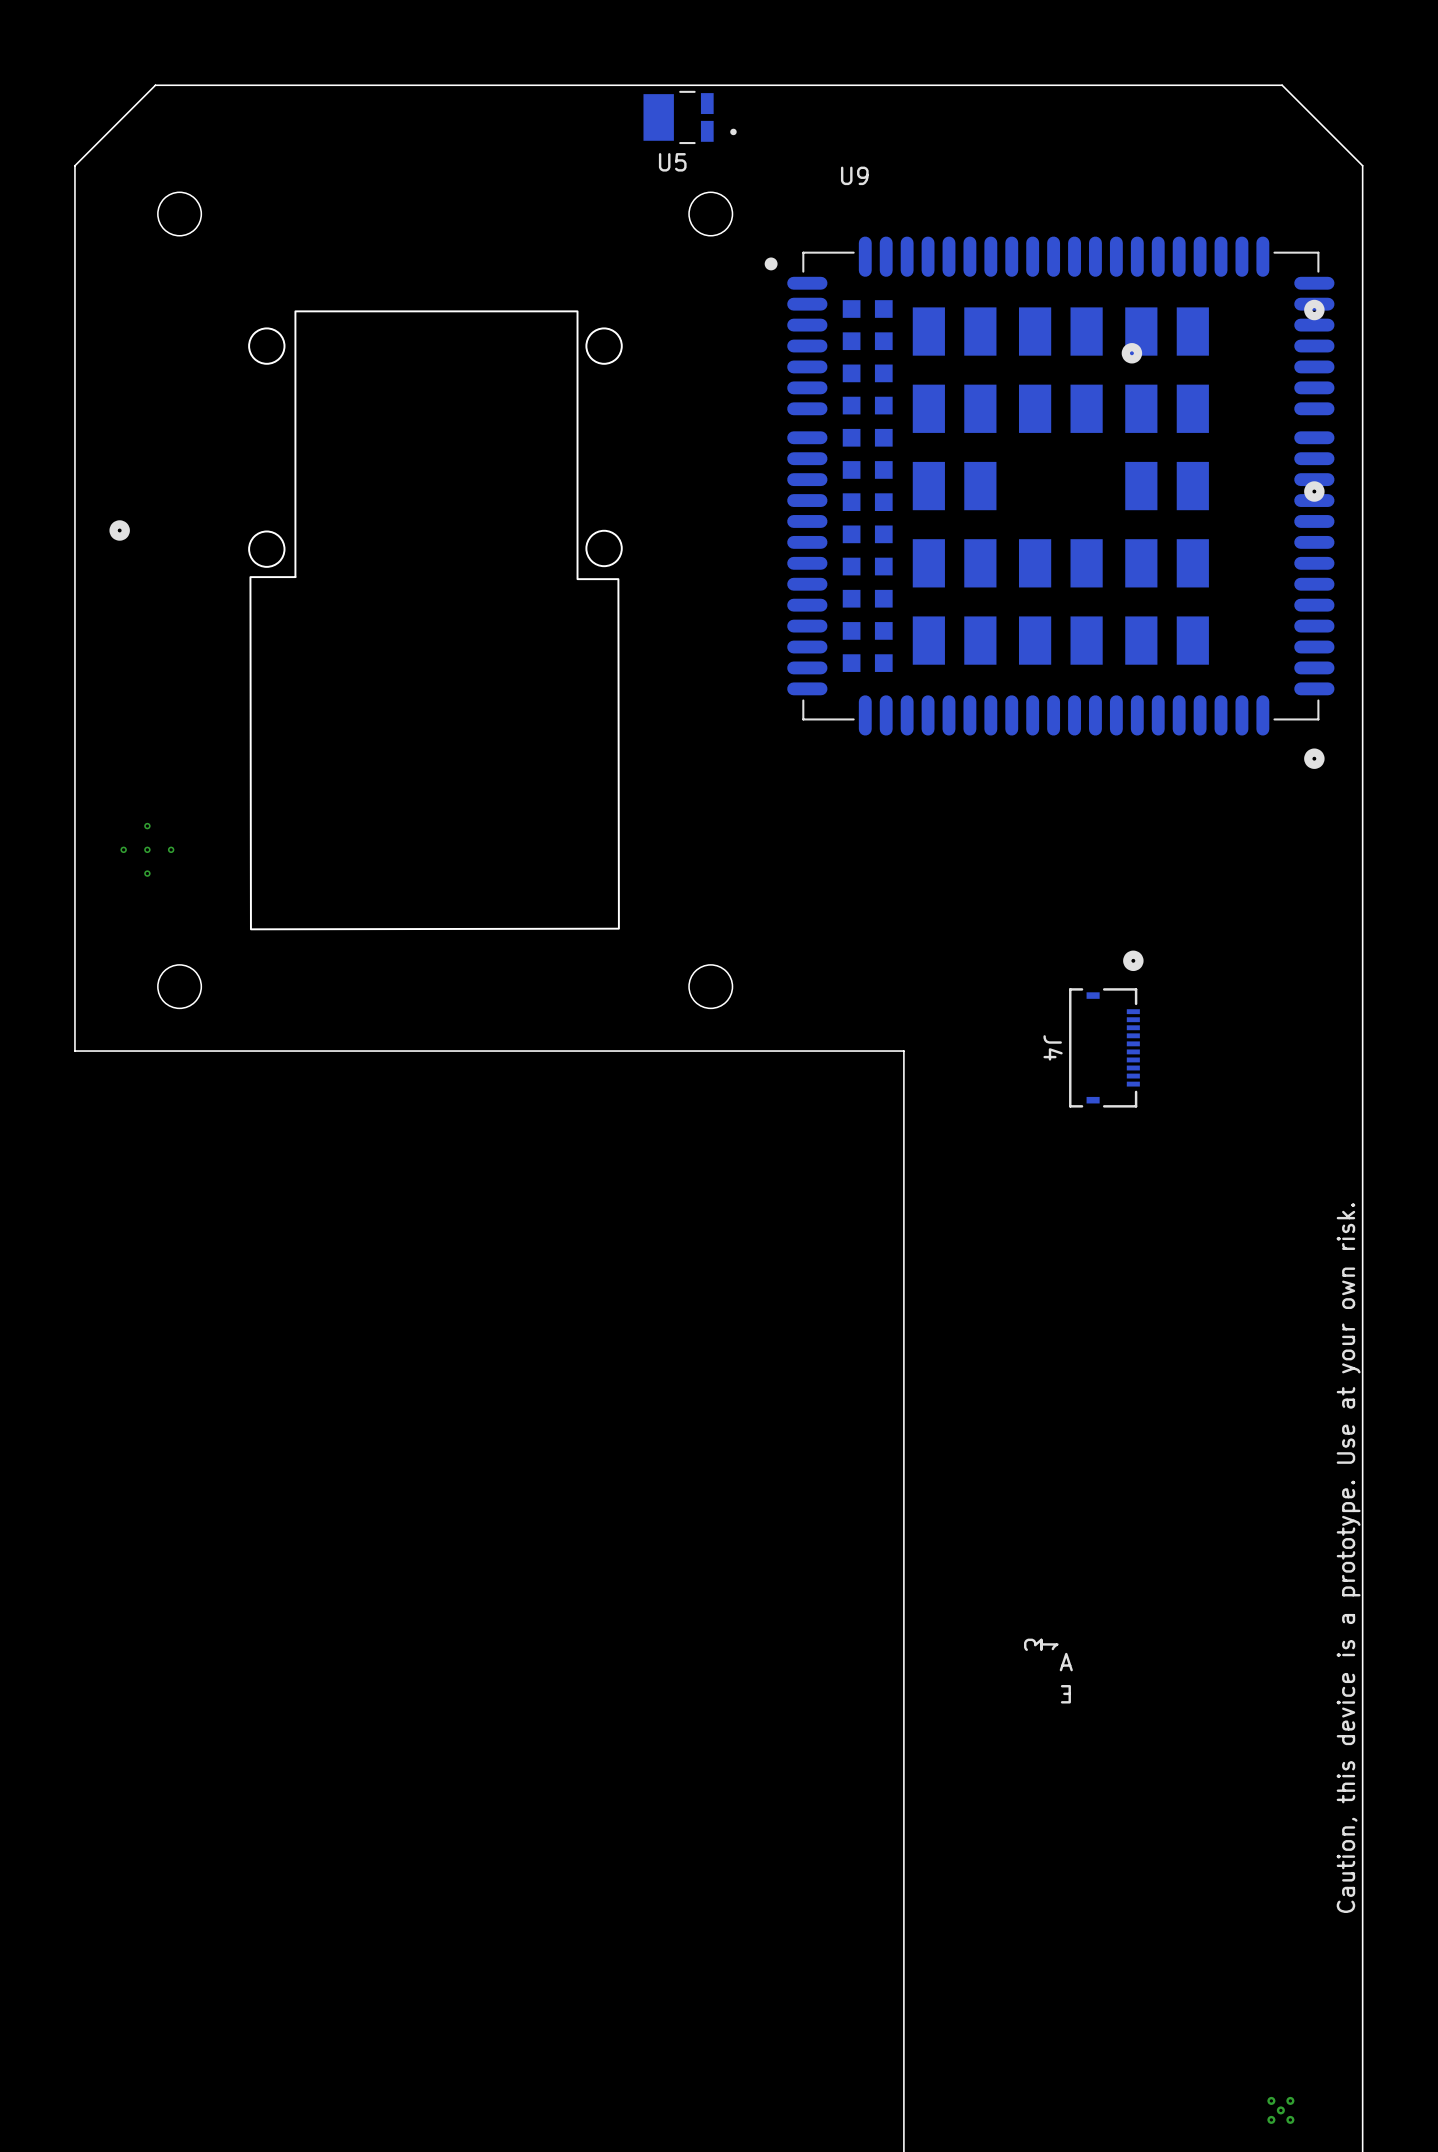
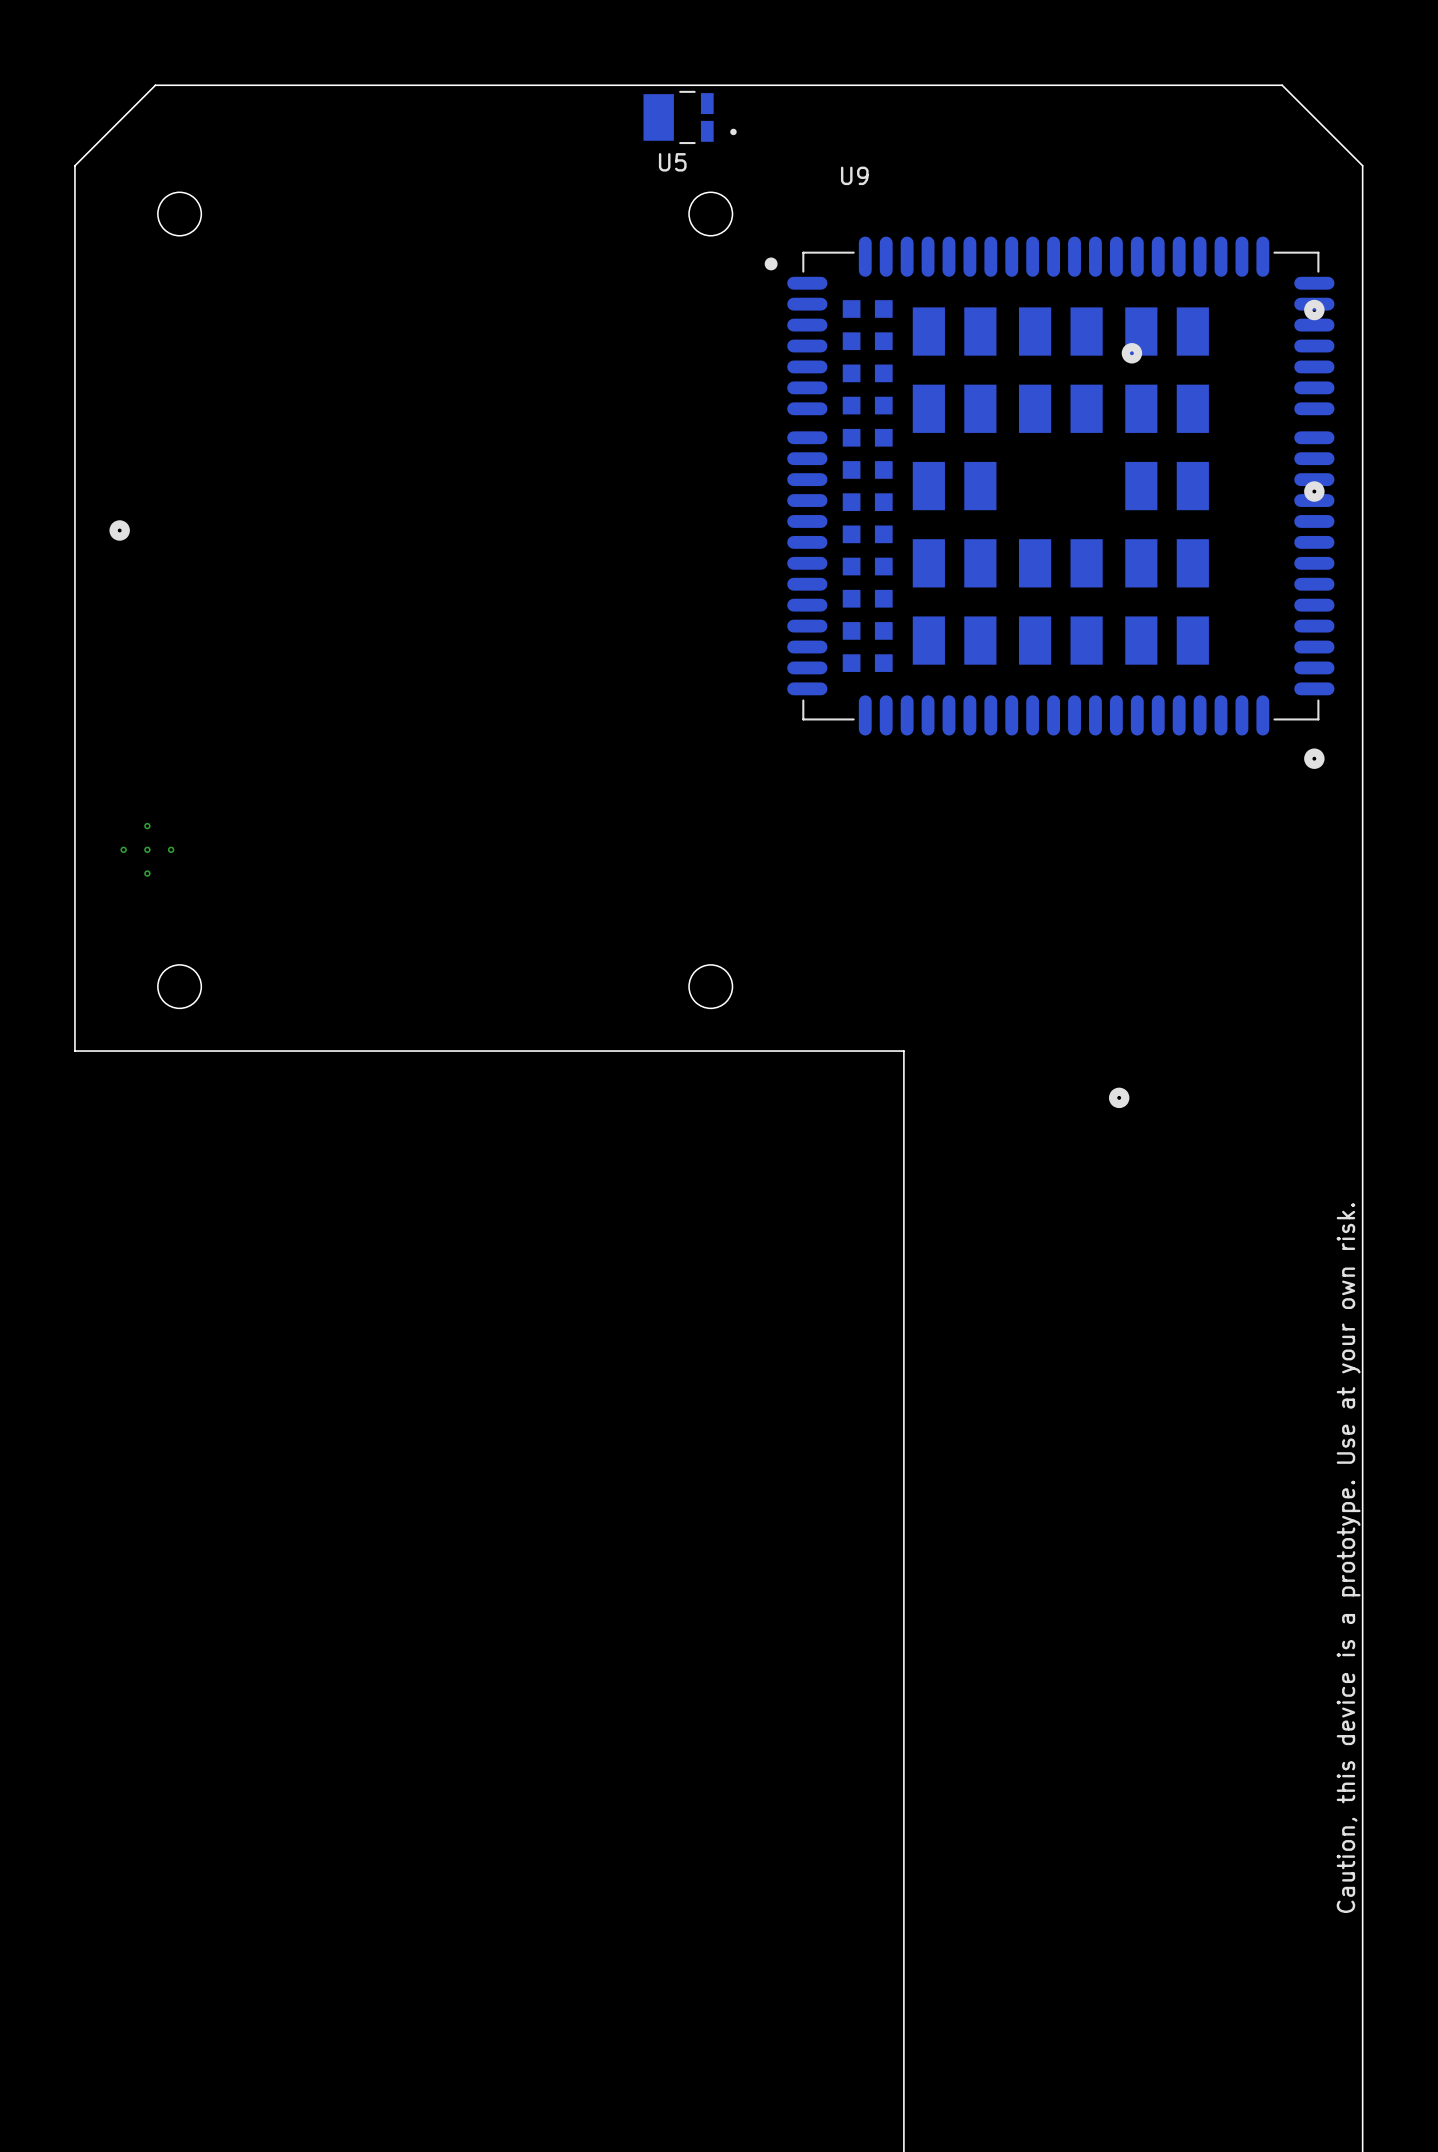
drawing: [248, 310, 623, 931] -> none
J4: (1106, 1029) -> none
part: none -> (1119, 1097)
part: (1048, 1671) -> none
part: (1280, 2110) -> none

